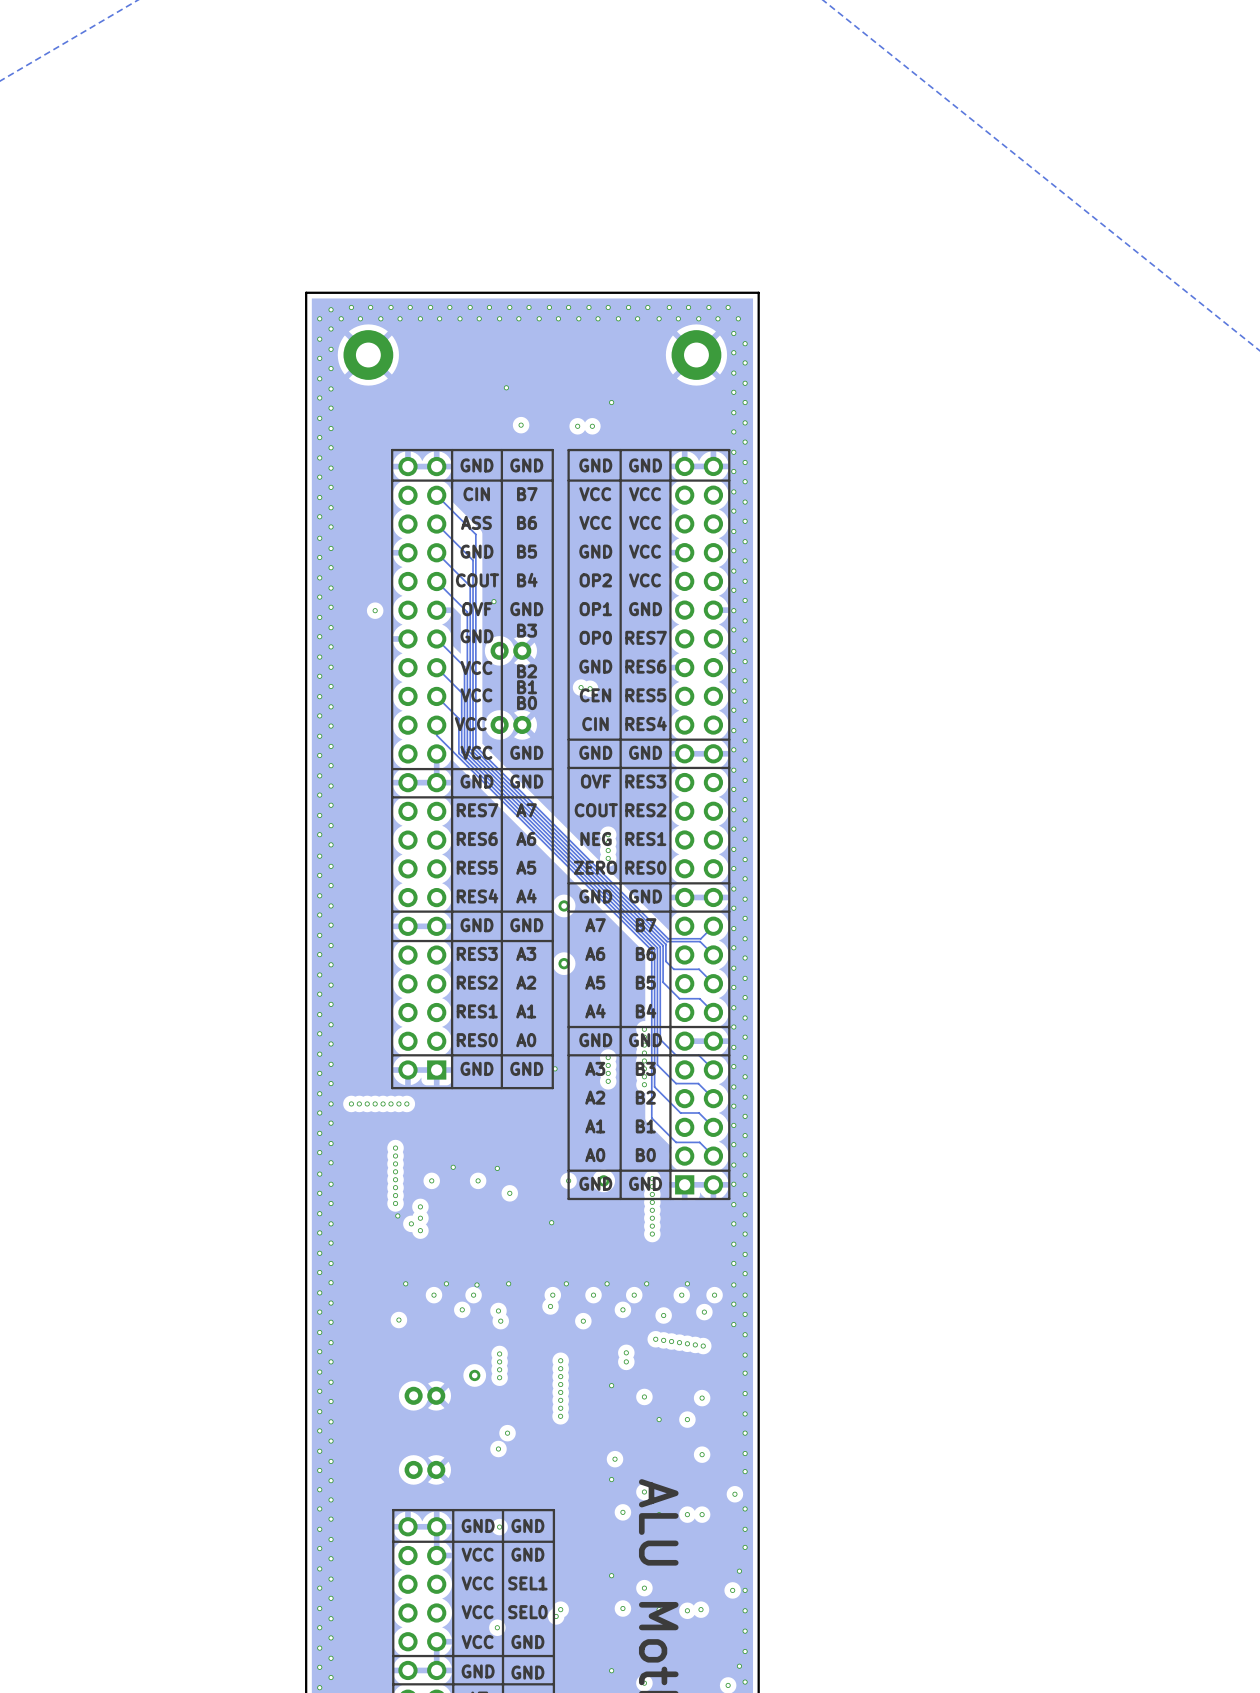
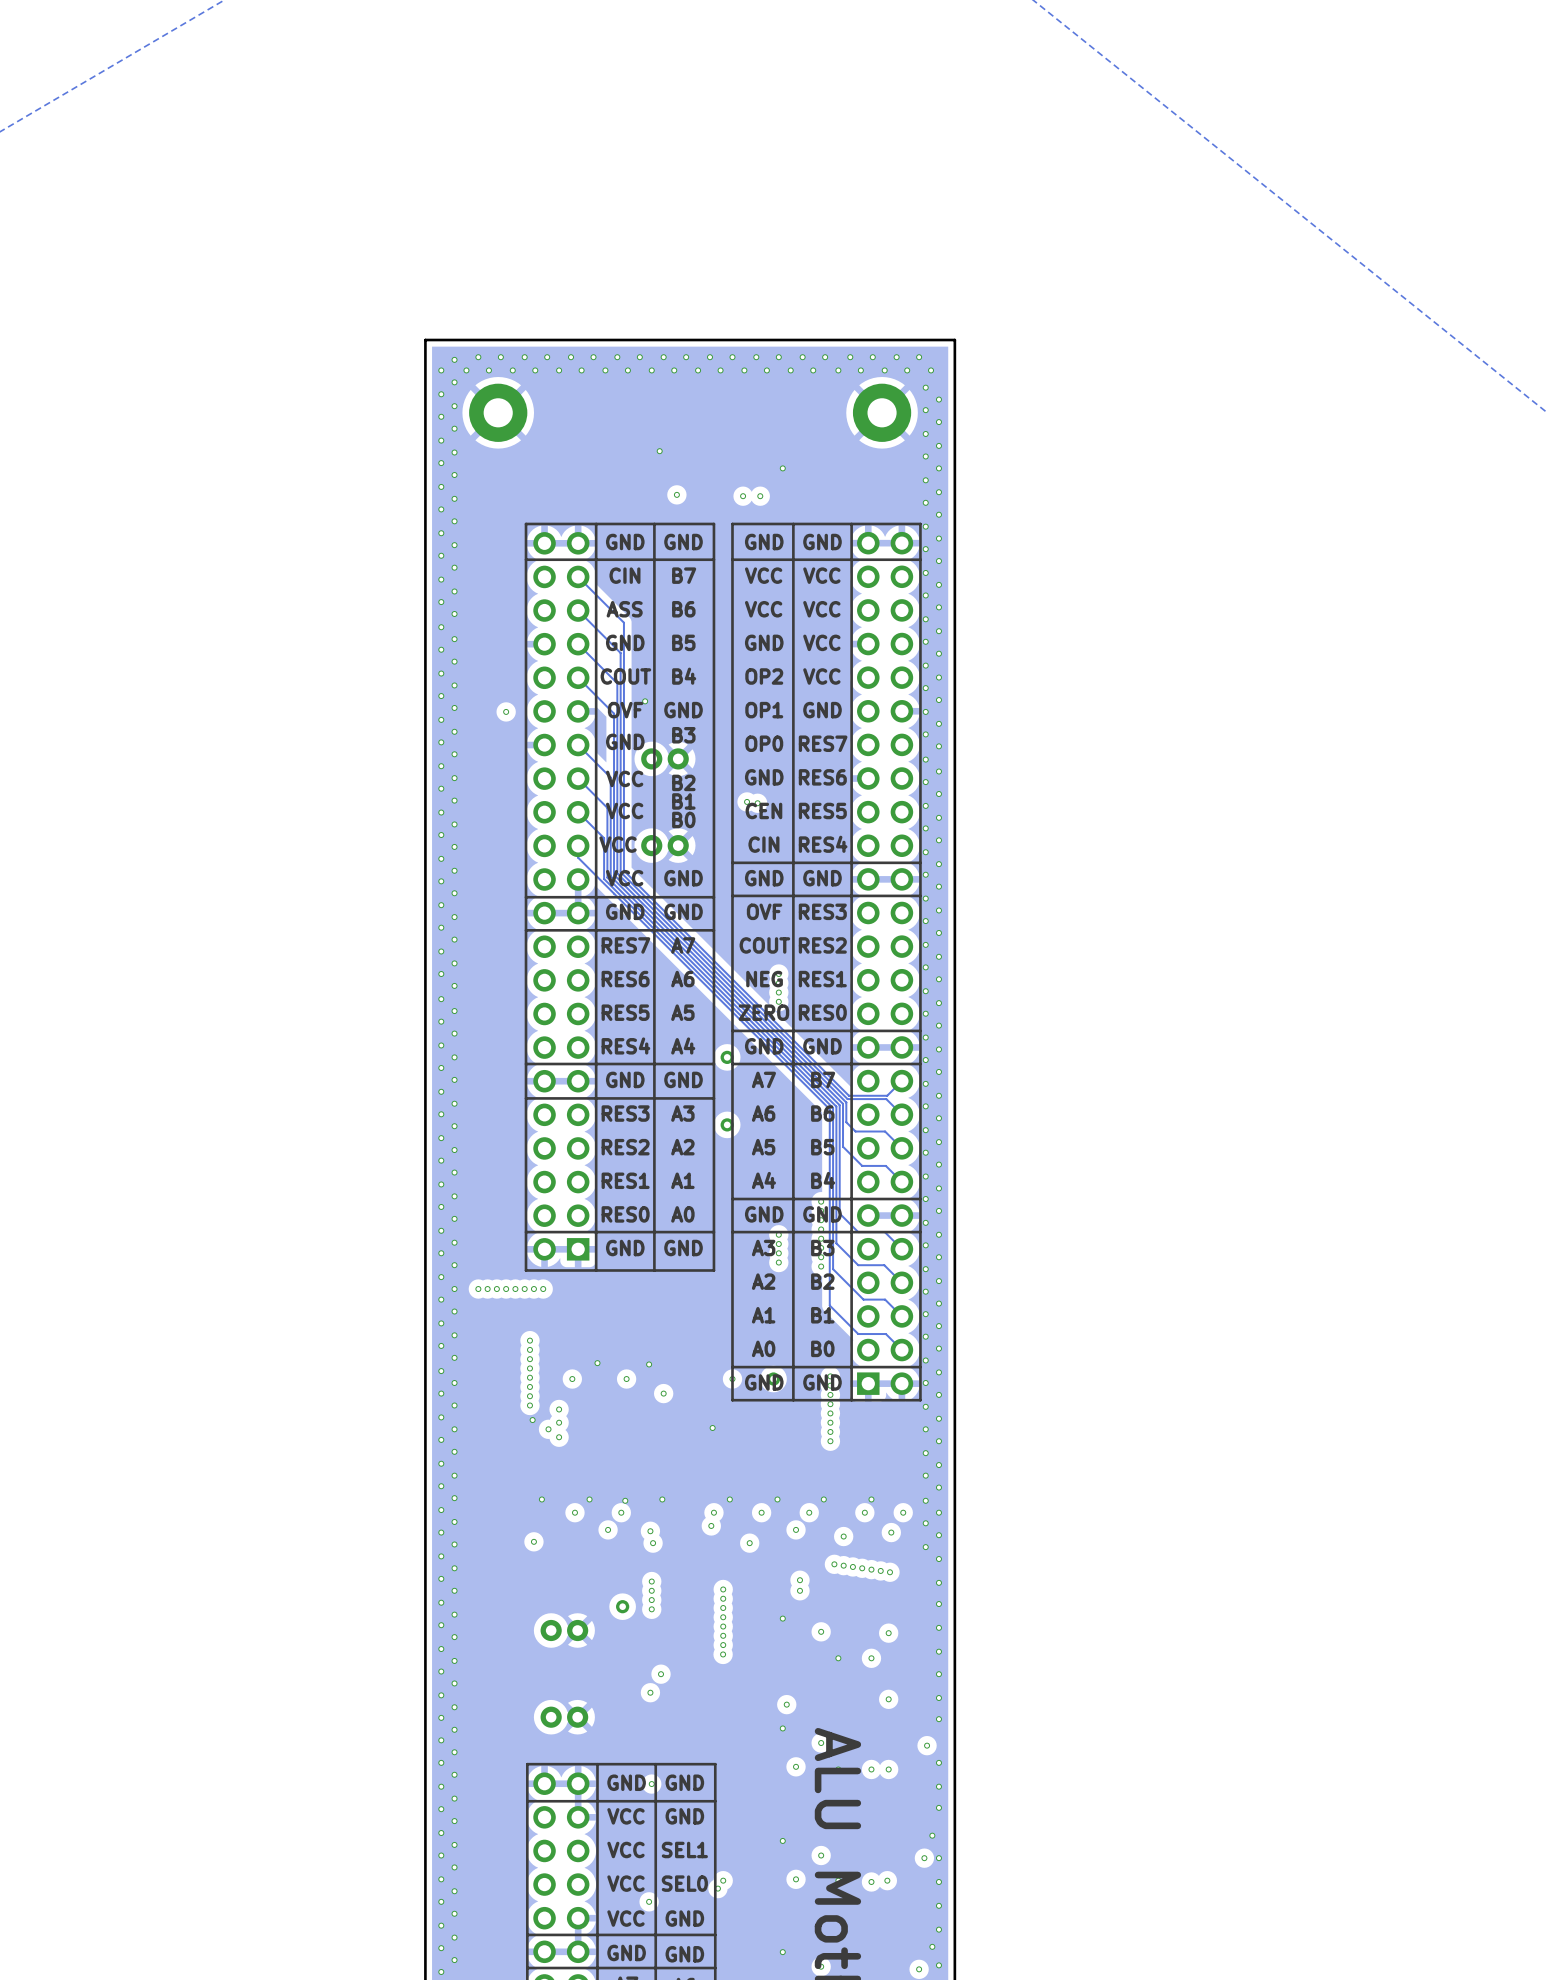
via: (555, 1068) -> none

